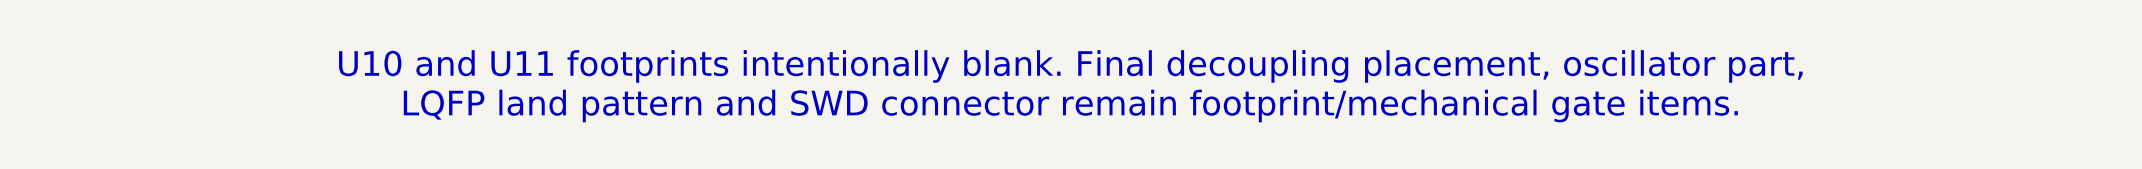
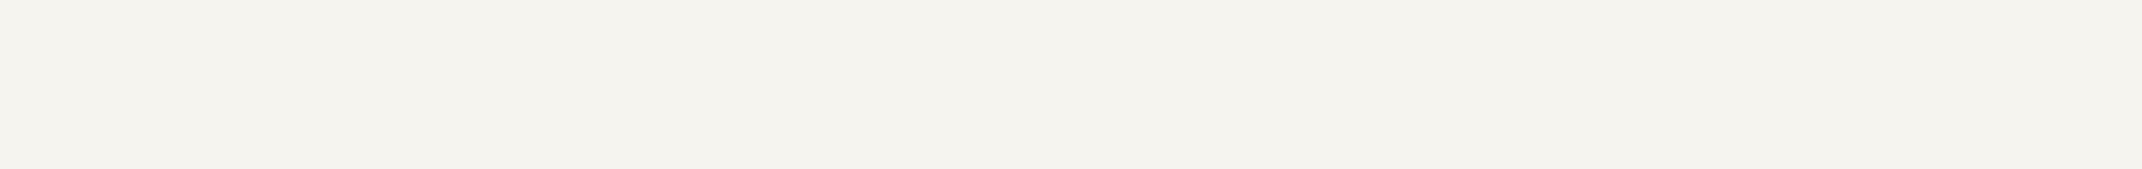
text: U10 and U11 footprints intentionally blank. Final decoupling placement, oscillator part, (1070, 66) -> none
text: LQFP land pattern and SWD connector remain footprint/mechanical gate items. (1070, 106) -> none

